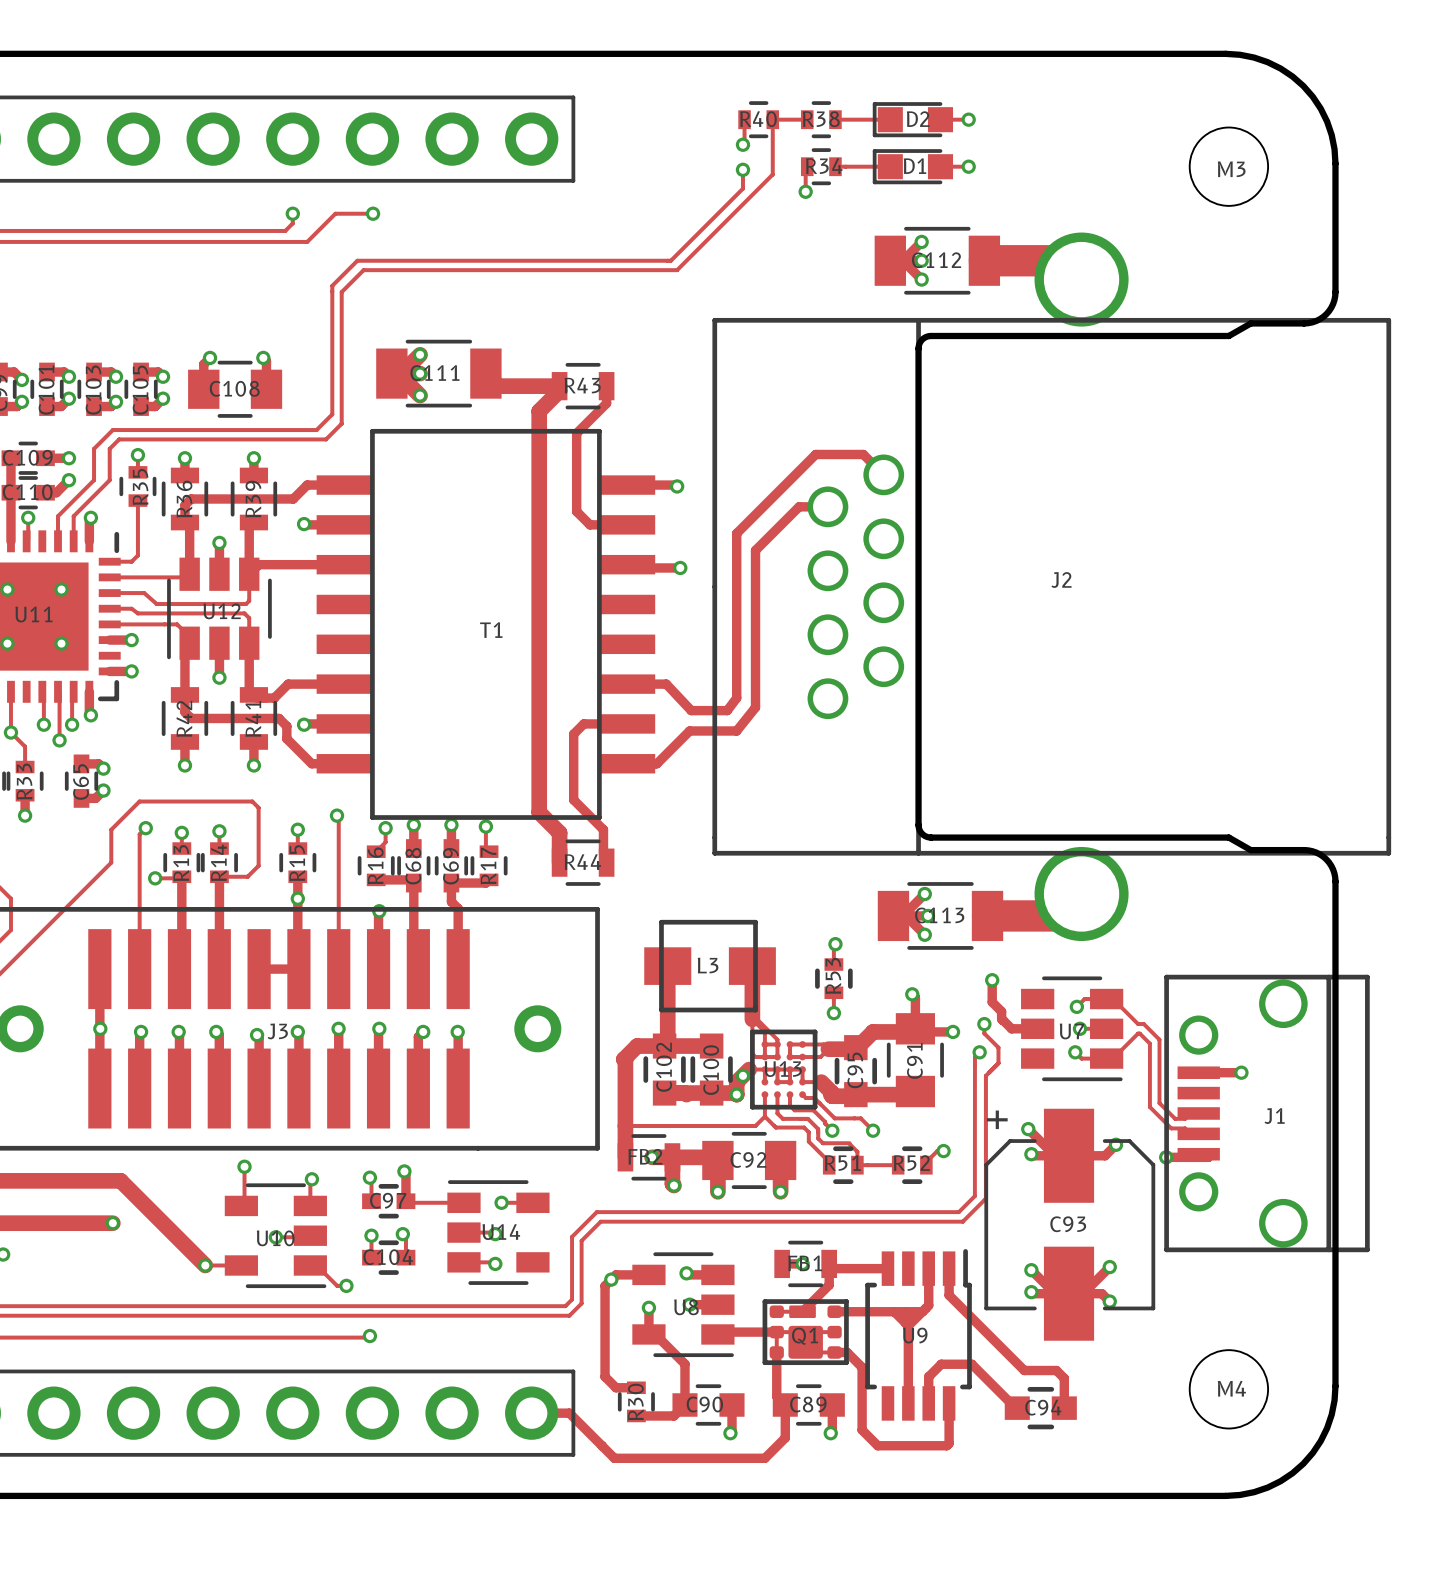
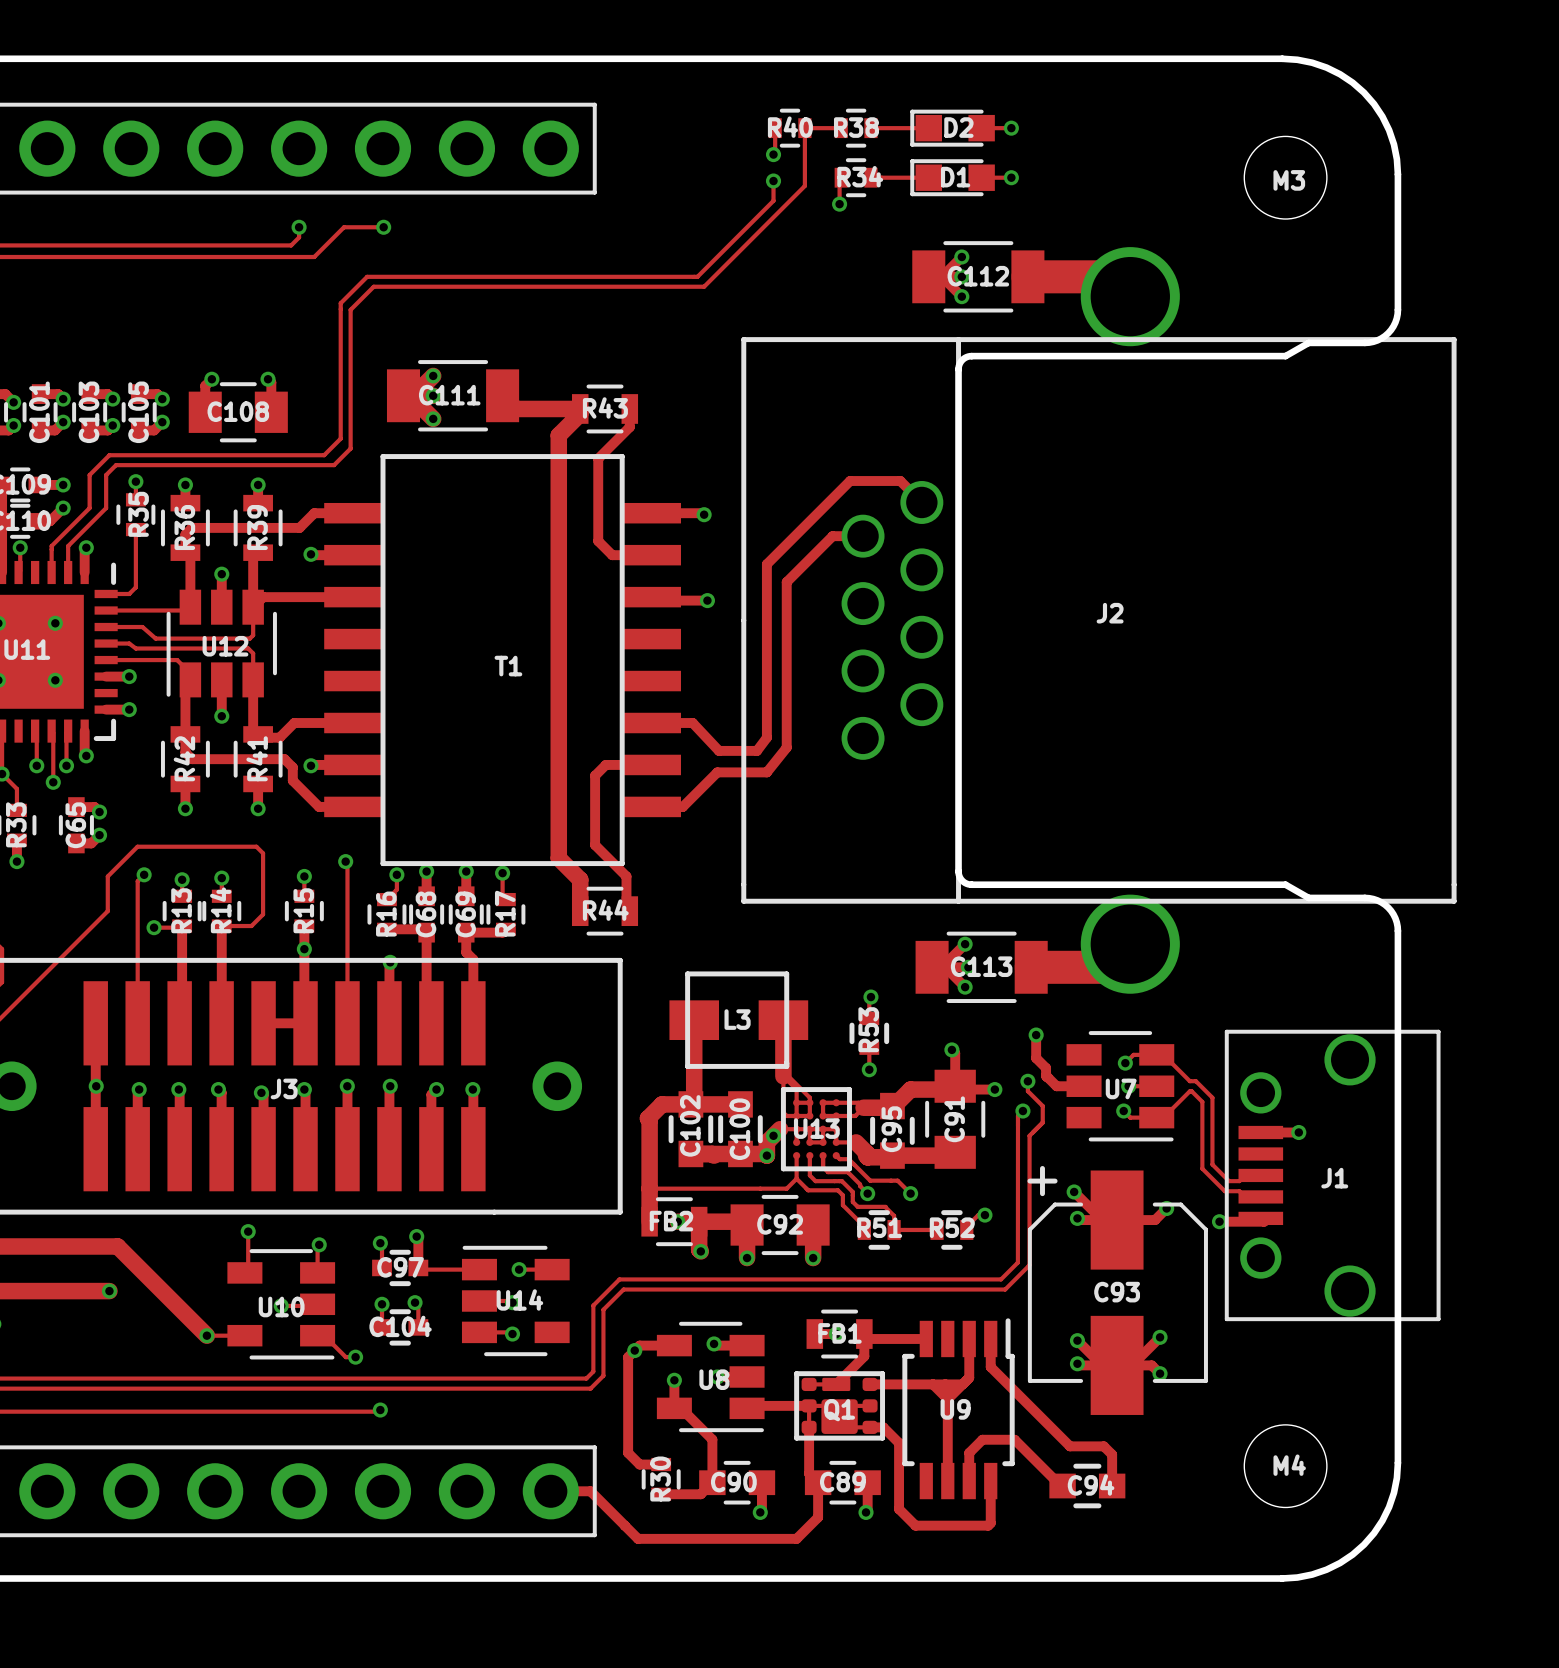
J1 footprint: [1164, 974, 1370, 1253] -> [1224, 1029, 1441, 1322]

